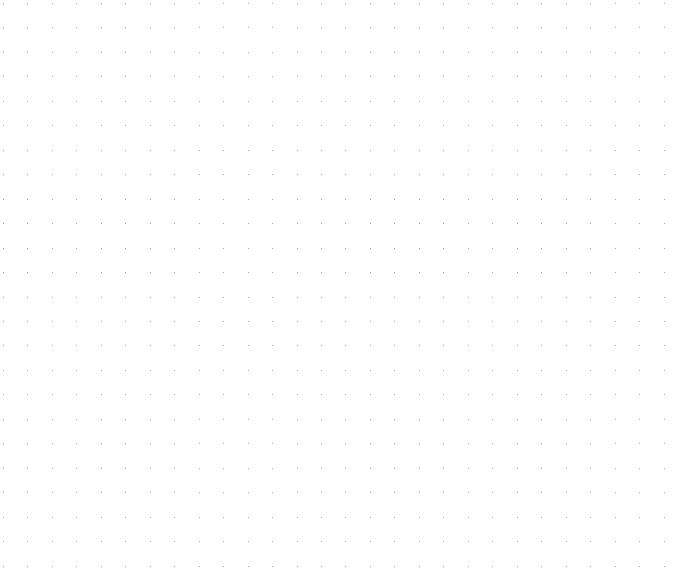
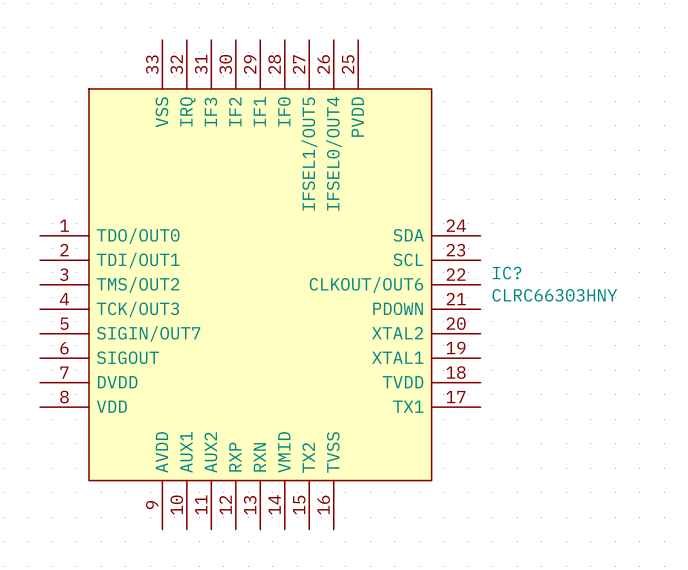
IC?: none -> CLRC66303HNY (260, 284)

